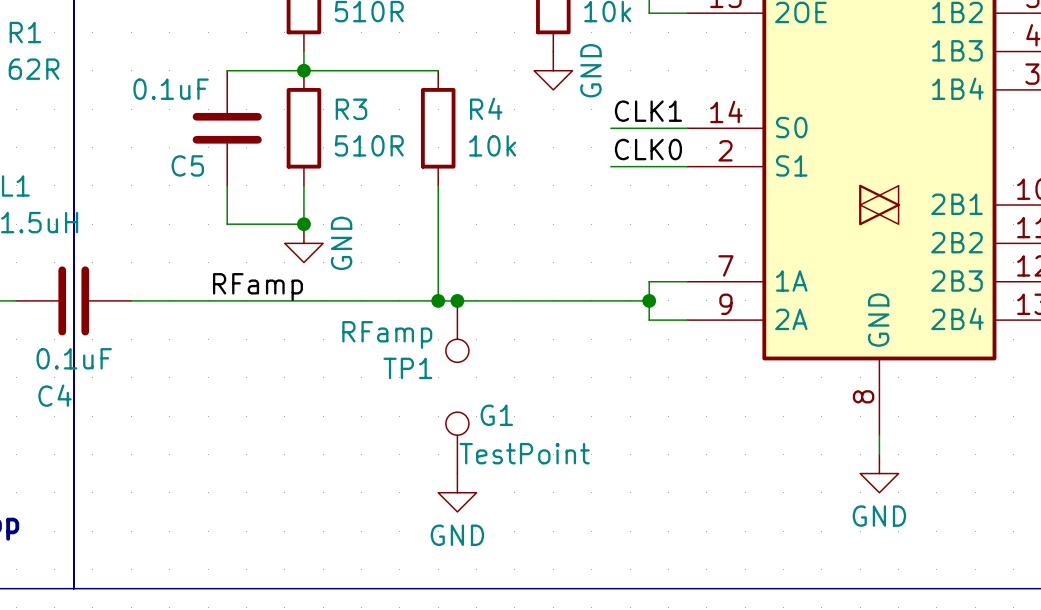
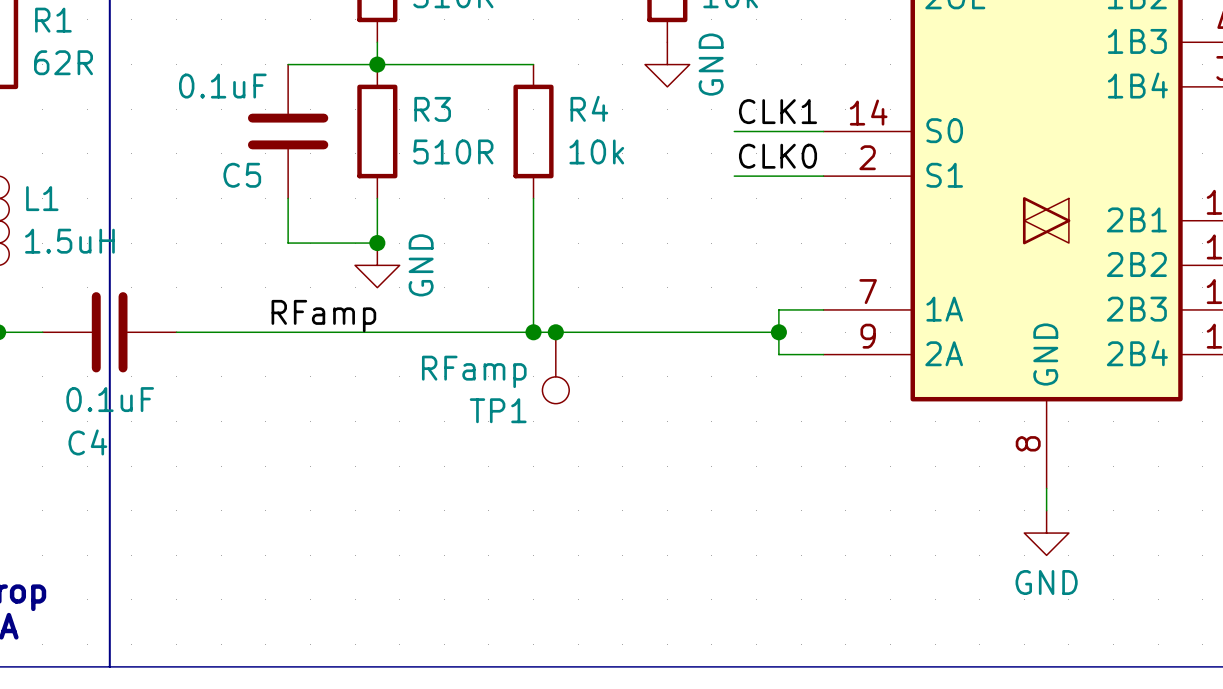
G1: TestPoint (457, 442) -> none
power symbol: GND (457, 492) -> none

